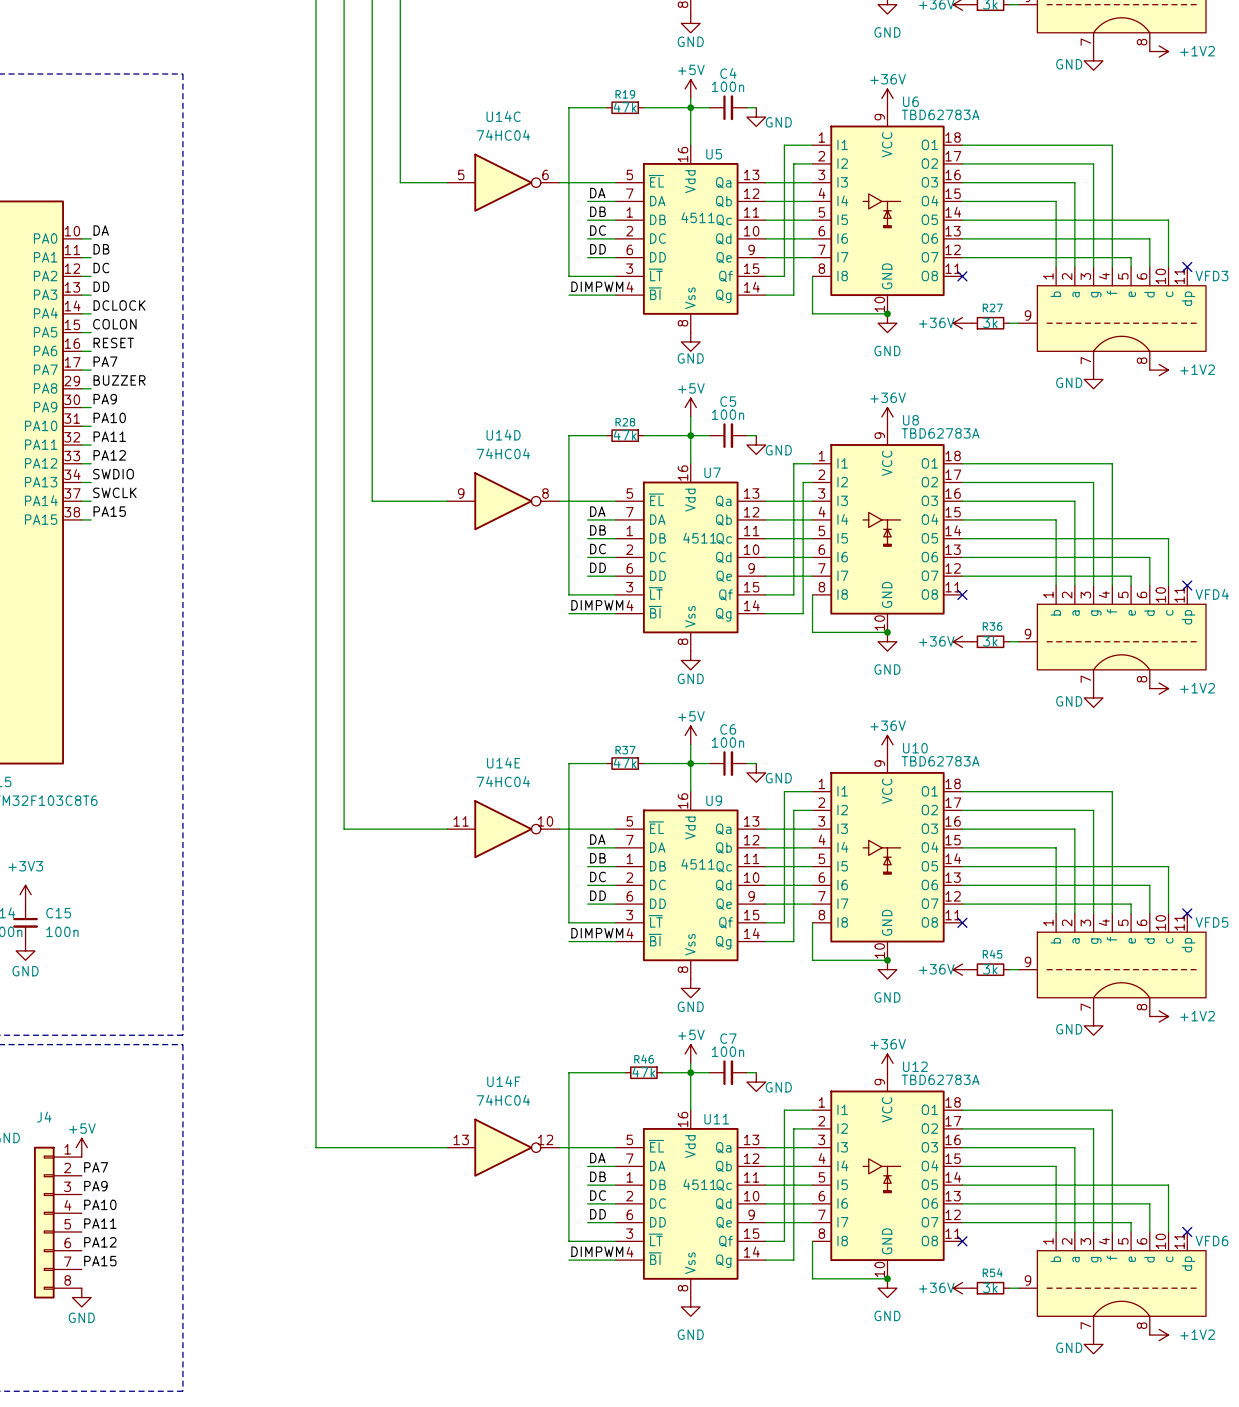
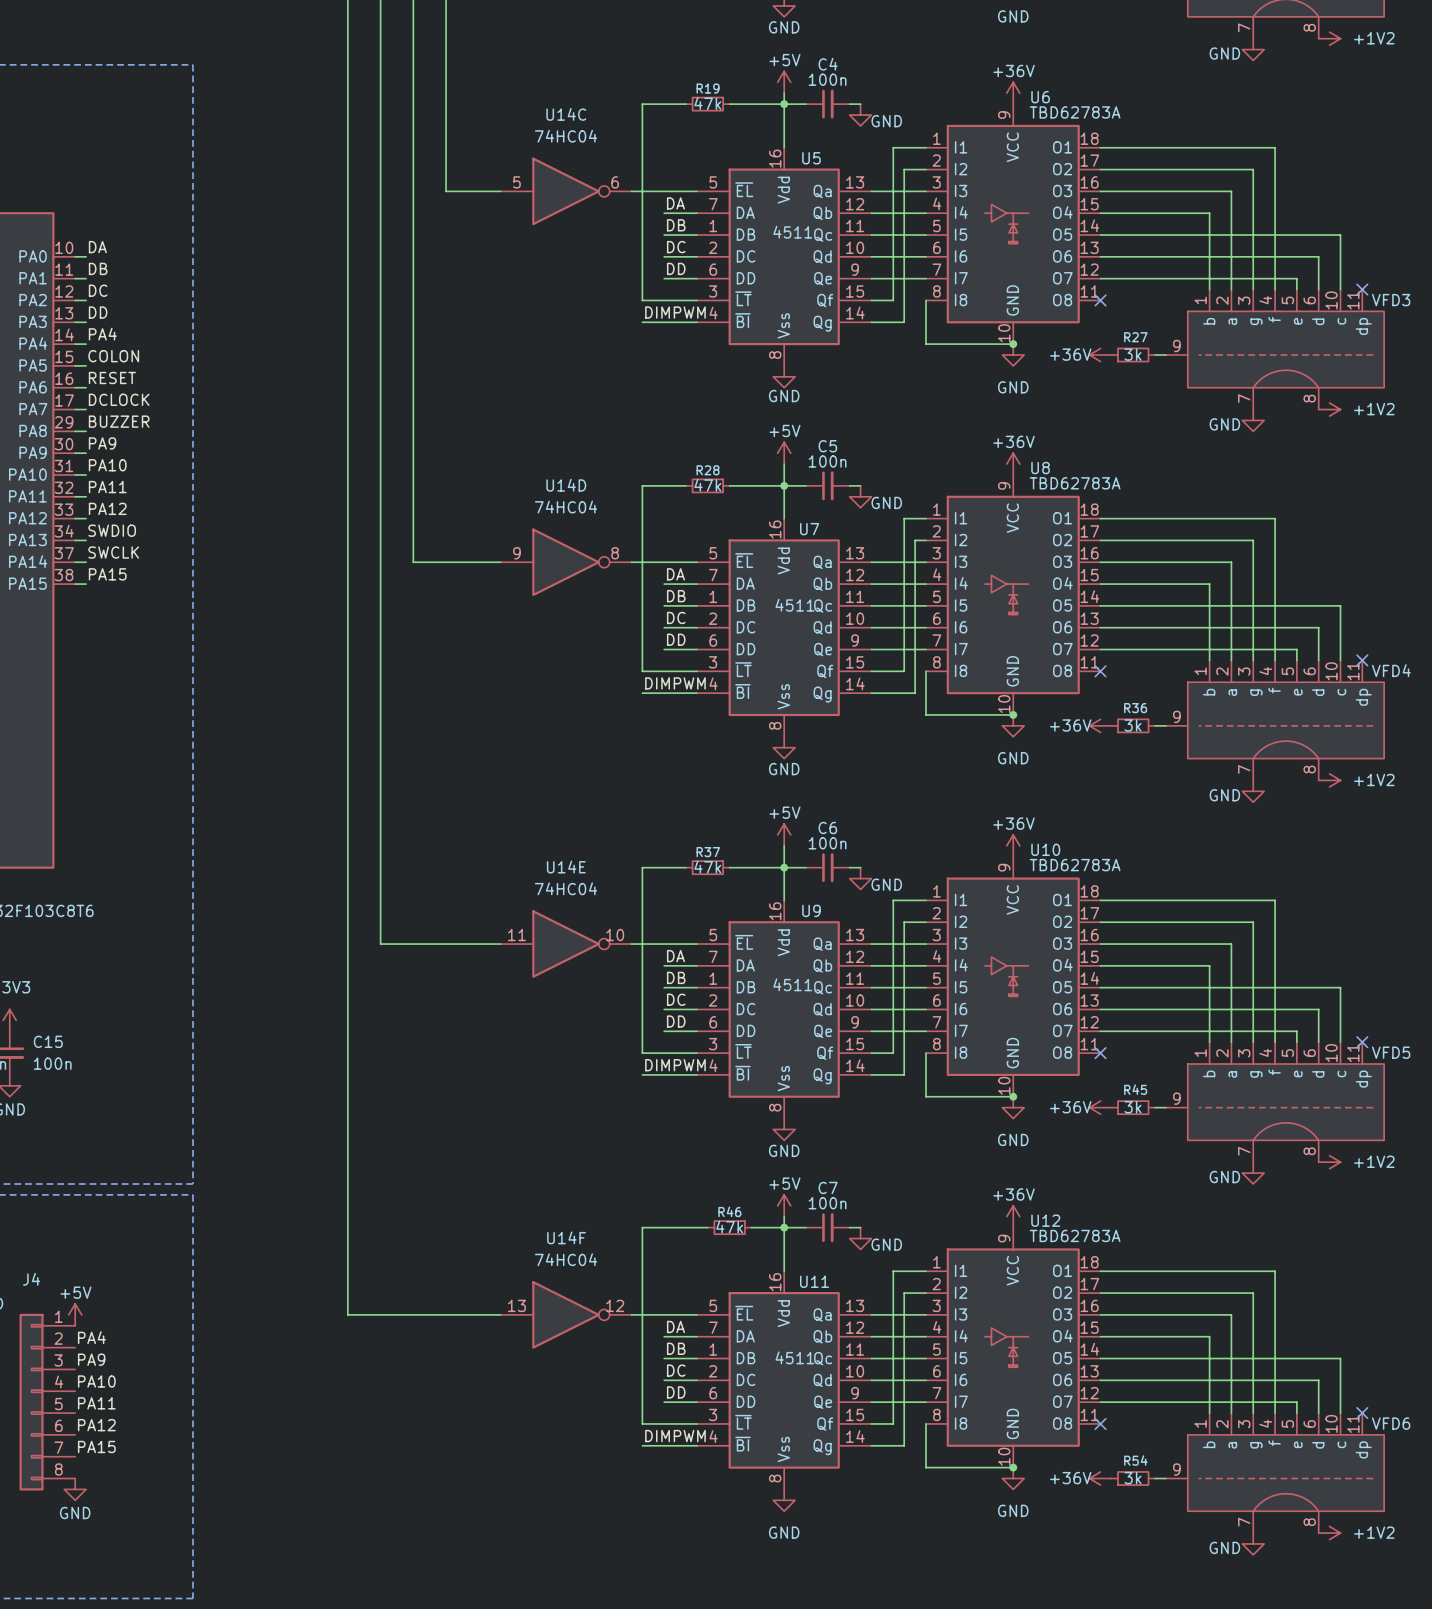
label: DCLOCK (119, 305) -> PA4 (102, 334)
label: PA7 (105, 361) -> DCLOCK (119, 399)
label: PA7 (96, 1167) -> PA4 (91, 1337)

